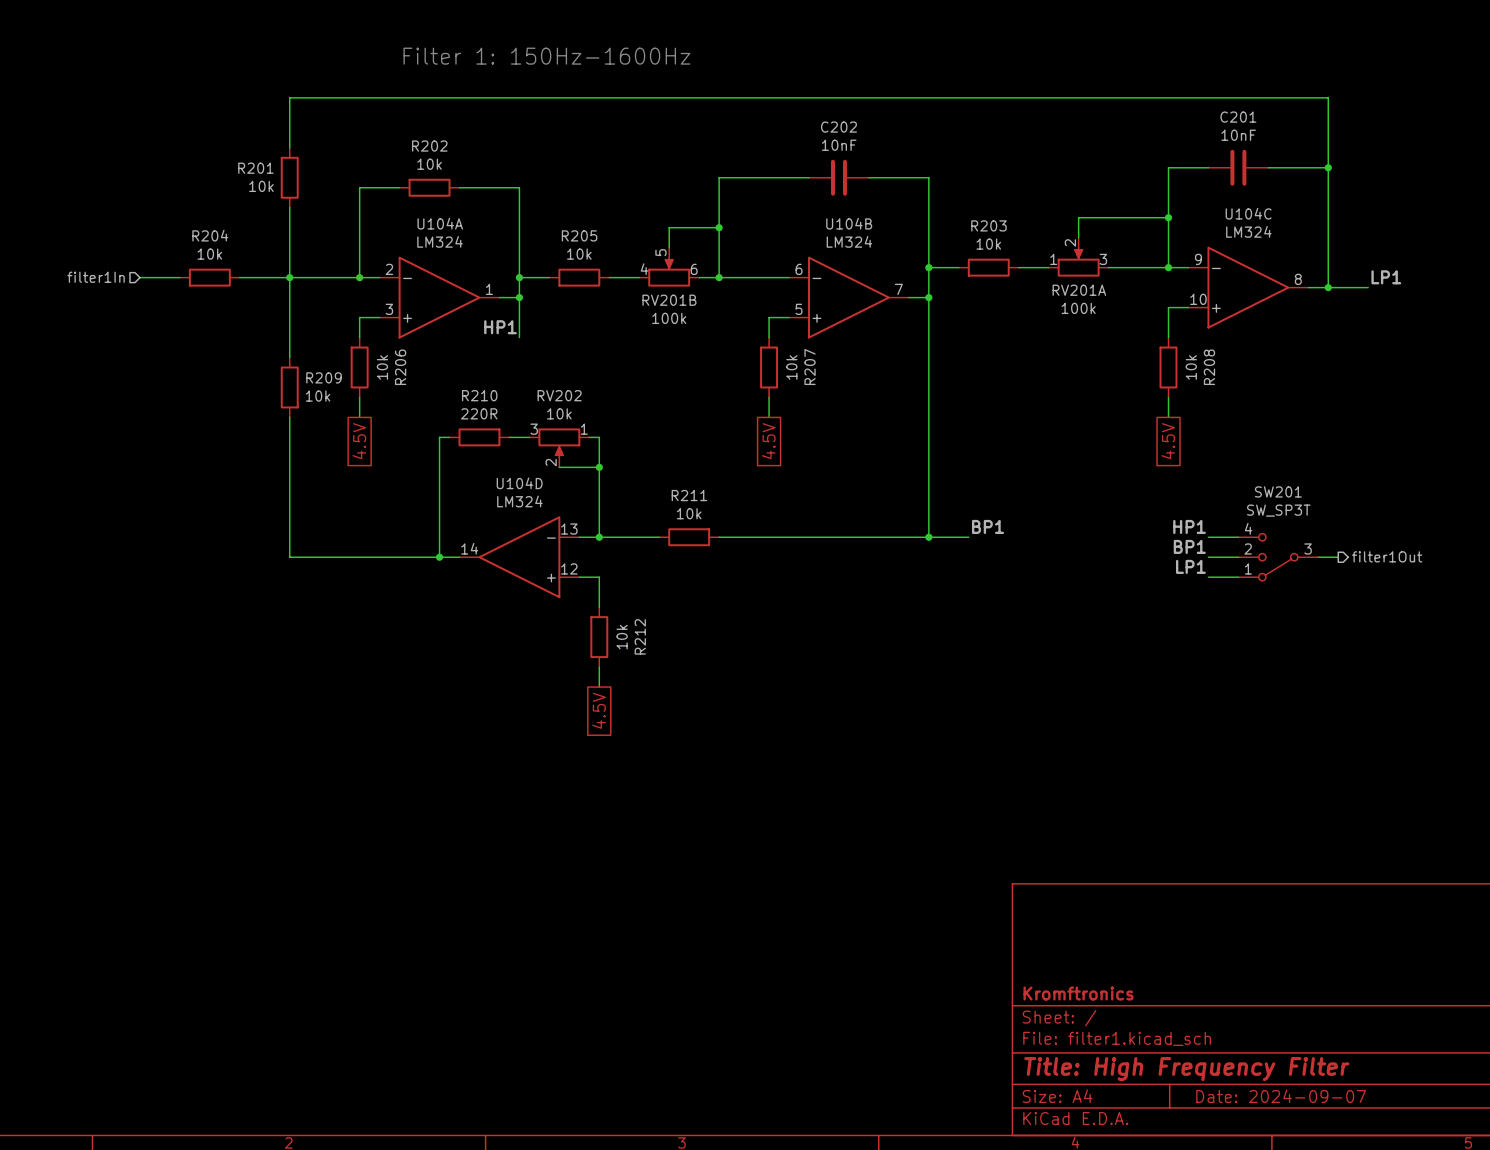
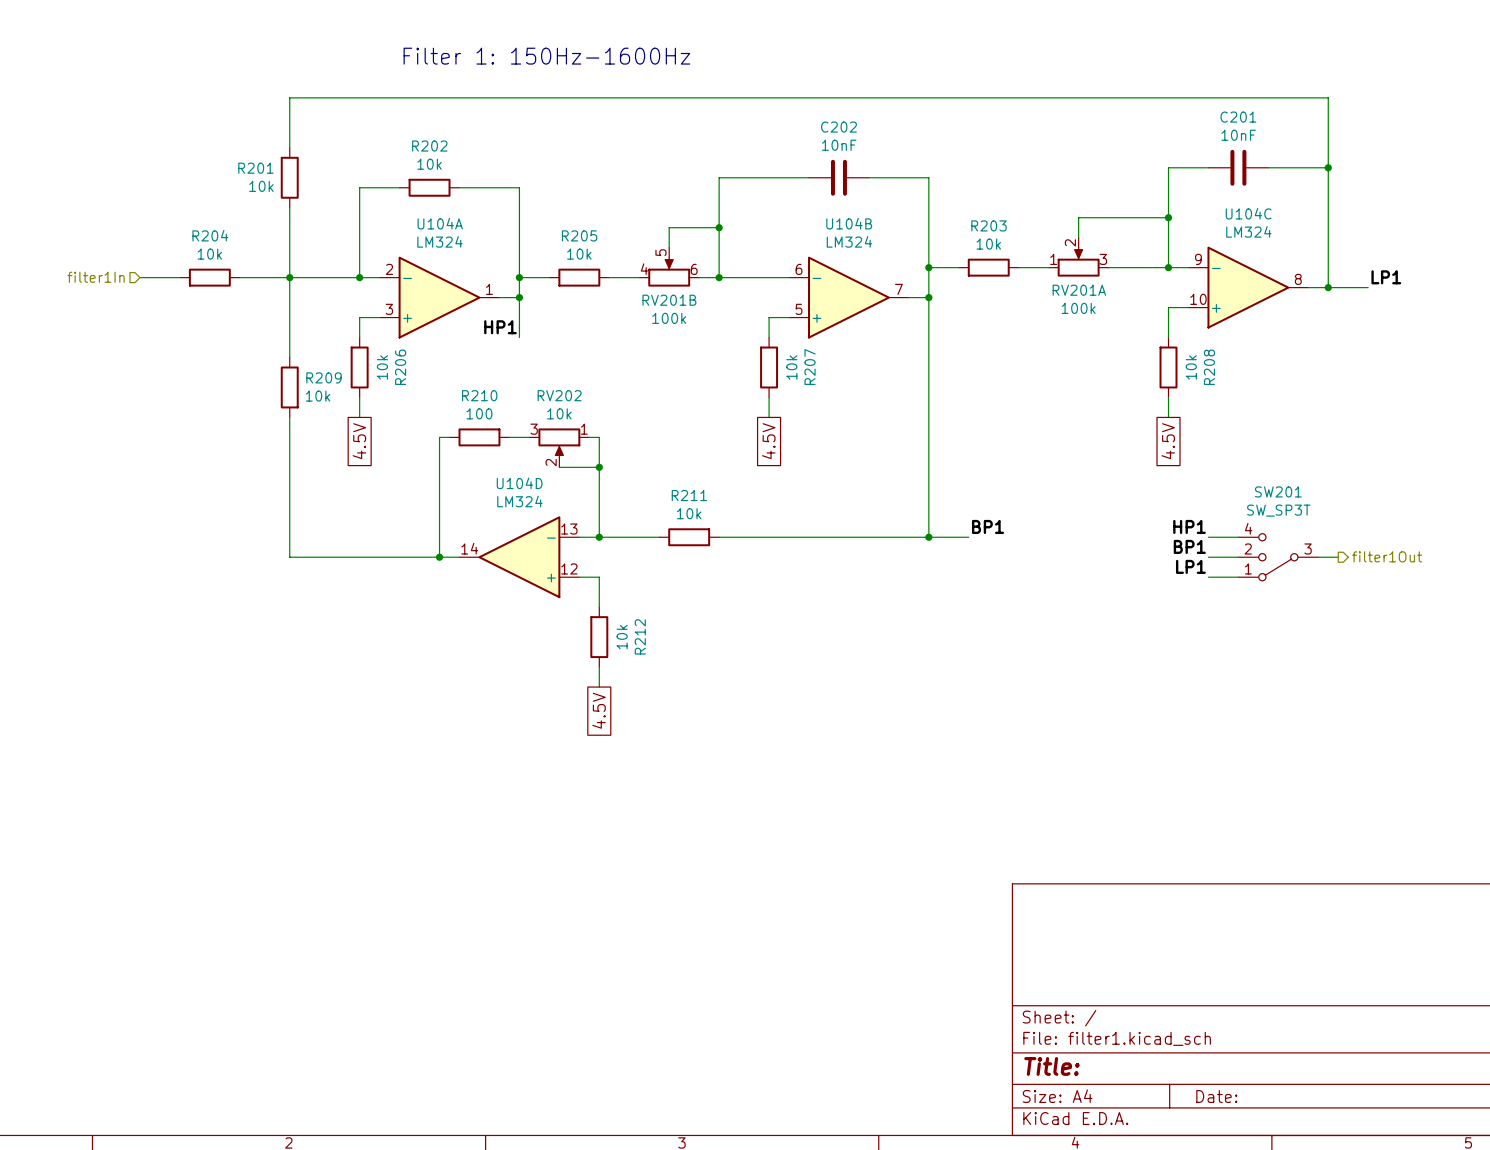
R210 value: 220R (479, 413) -> 100 (479, 413)
title block: Kromftronics (1078, 993) -> none
title block: Title: High Frequency Filter (1186, 1069) -> Title: (1051, 1066)
title block: Date: 2024-09-07 (1281, 1096) -> Date: (1216, 1096)

